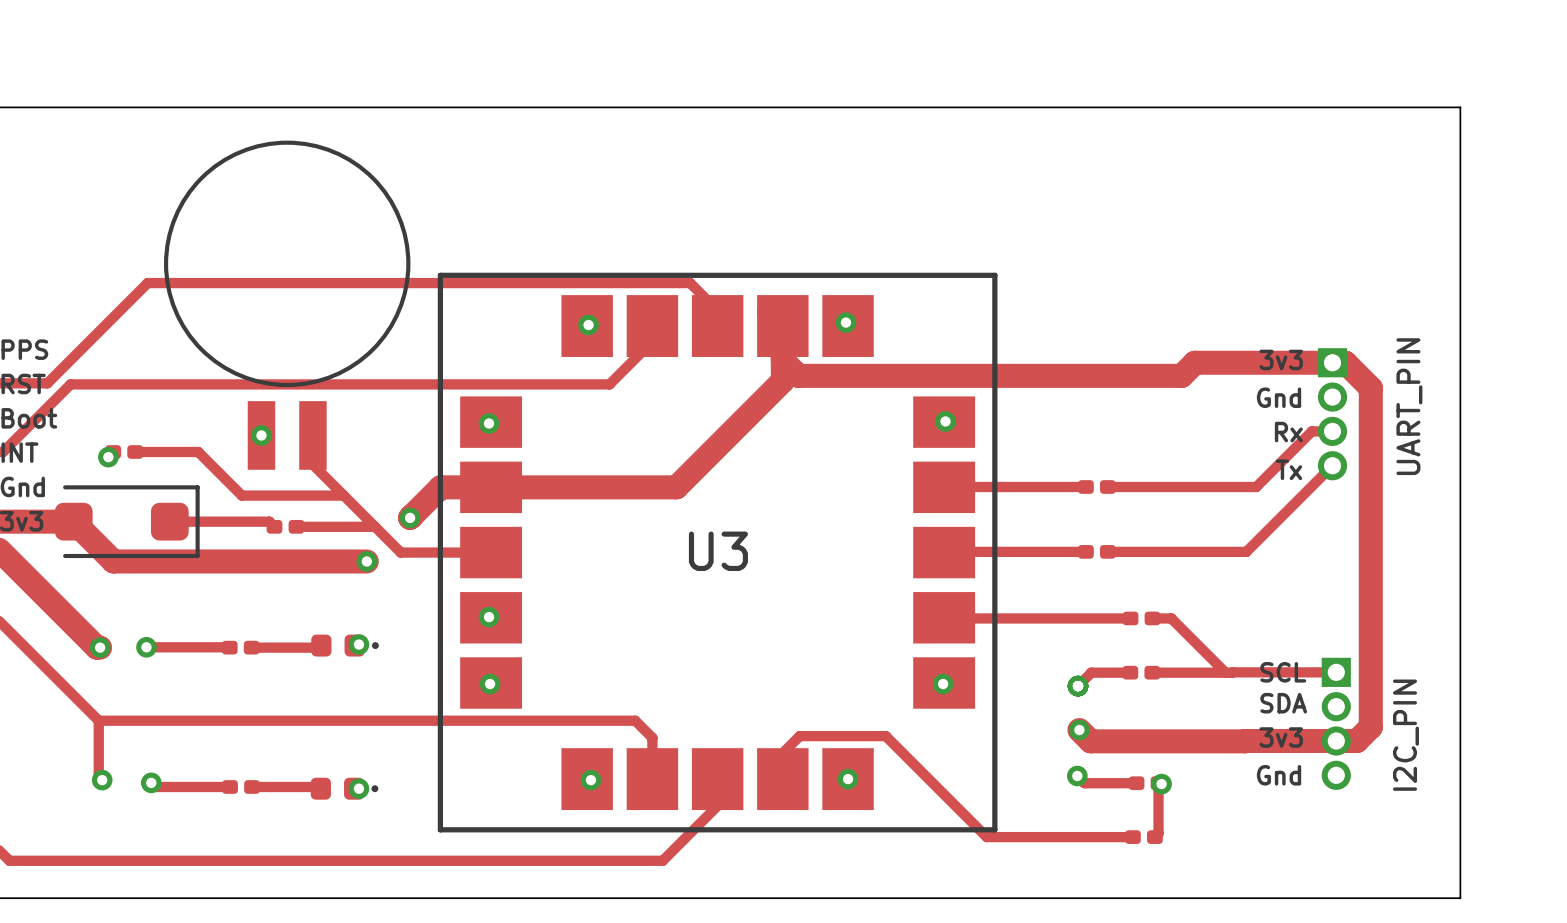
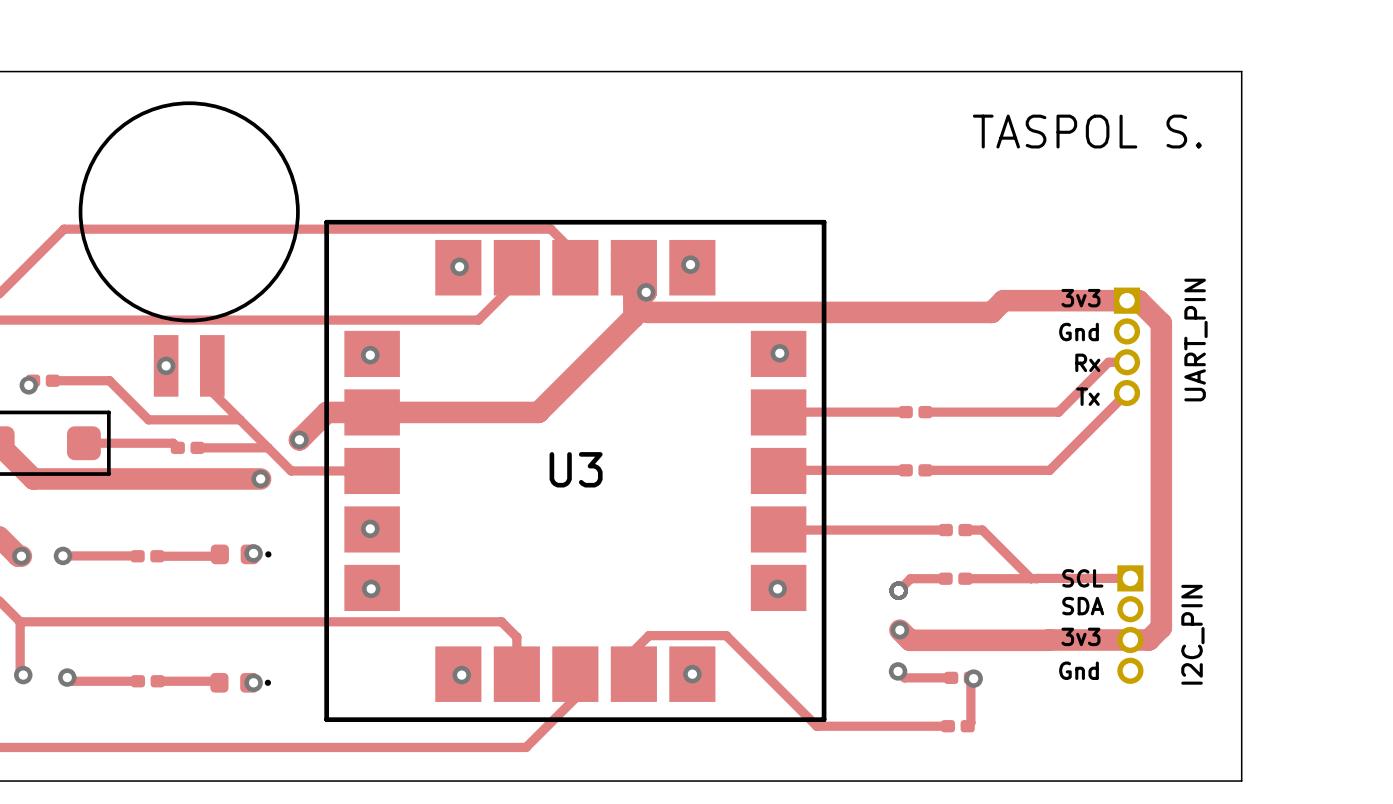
text: none -> TASPOL S. (1087, 131)
via: none -> (646, 292)

